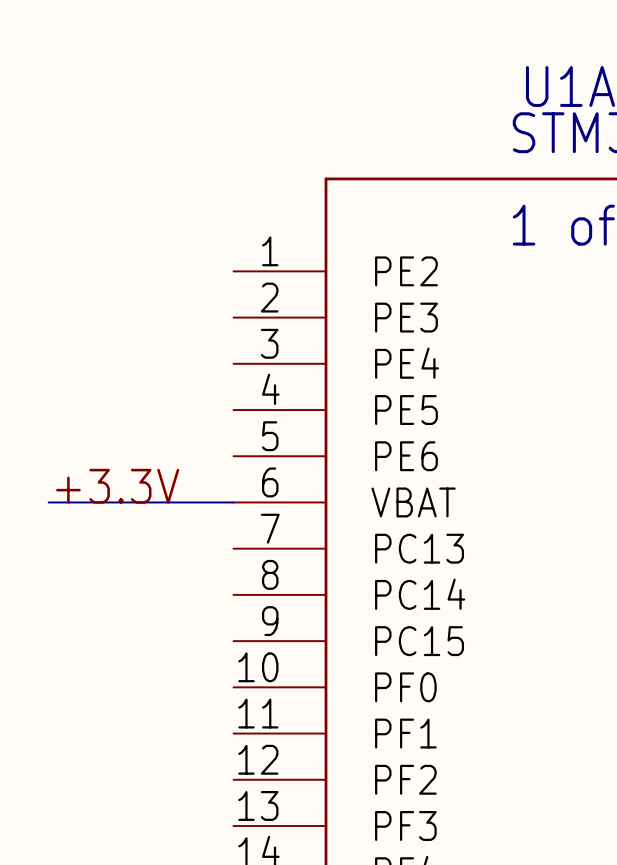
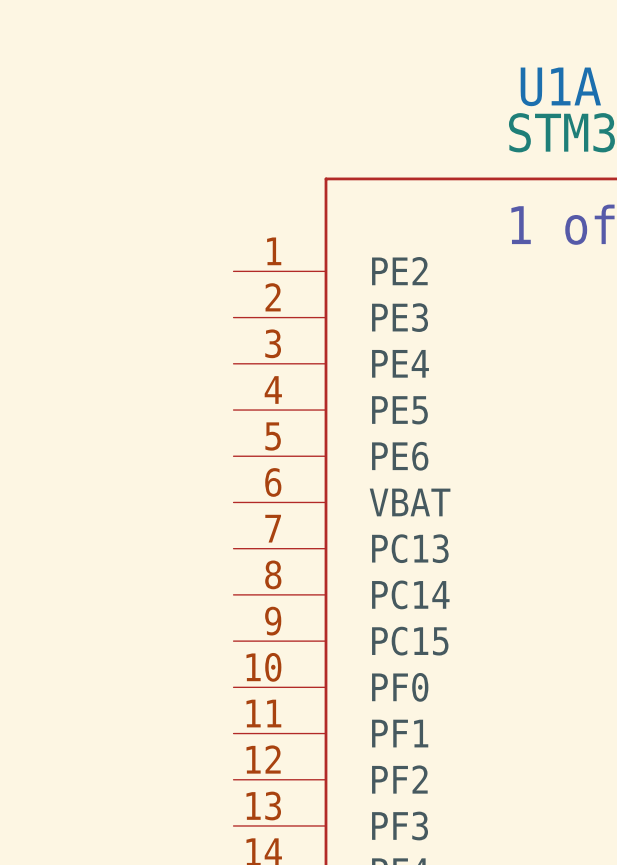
label: +3.3V (117, 486) -> none
wire: (48, 502) (233, 502) -> none

